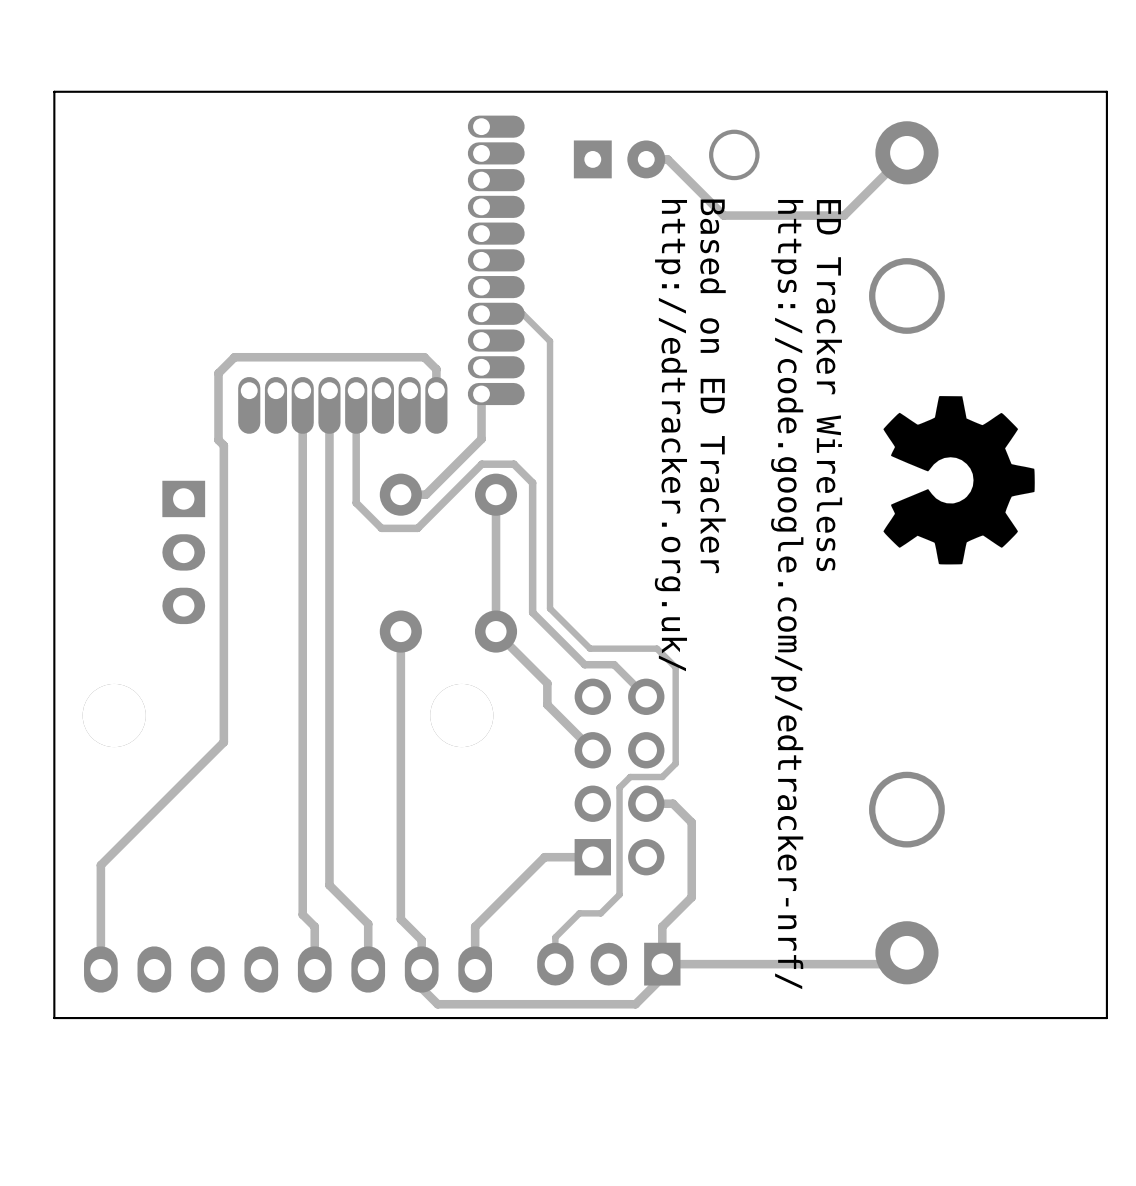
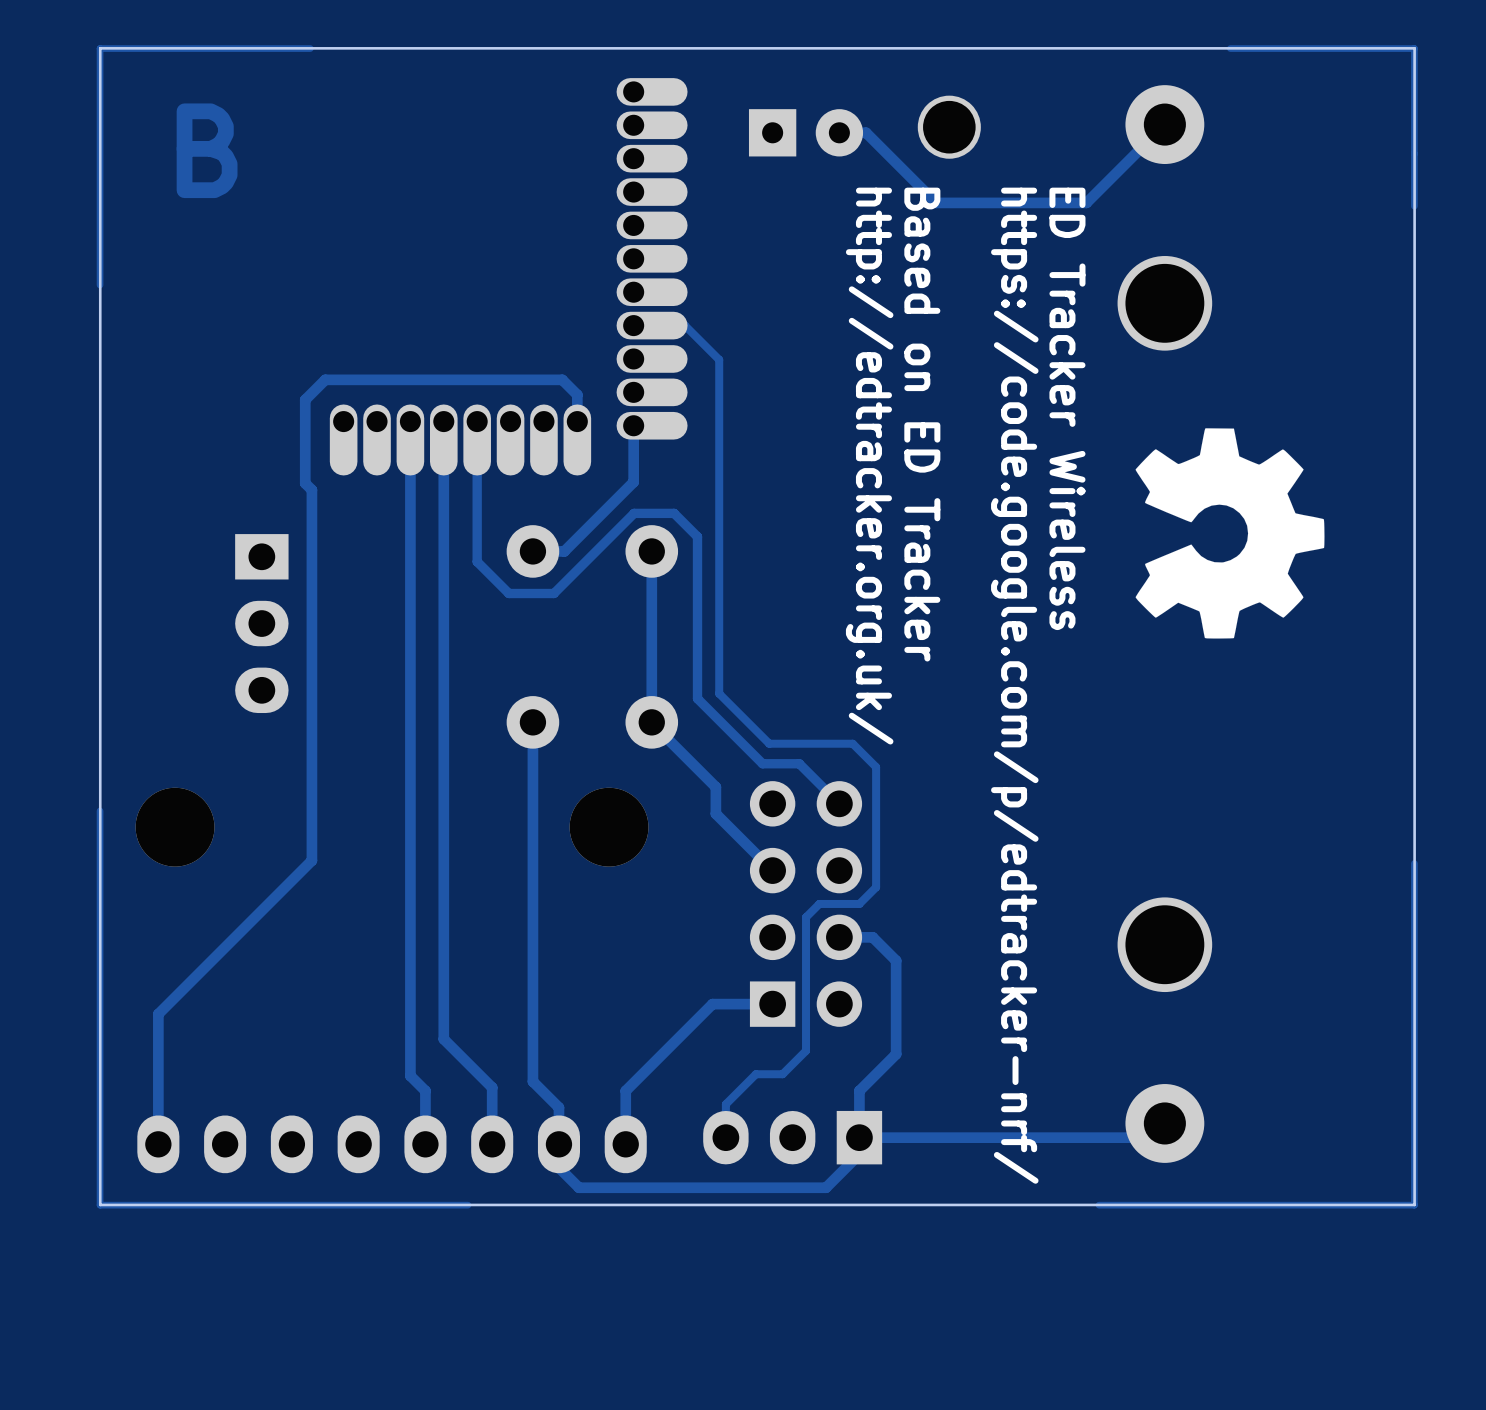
track: none -> (310, 48) (100, 48) (100, 285)
track: none -> (1230, 48) (1414, 48) (1414, 206)
text: none -> B (207, 150)
track: none -> (100, 810) (100, 1205) (468, 1205)
track: none -> (1414, 863) (1414, 1205) (1098, 1205)

